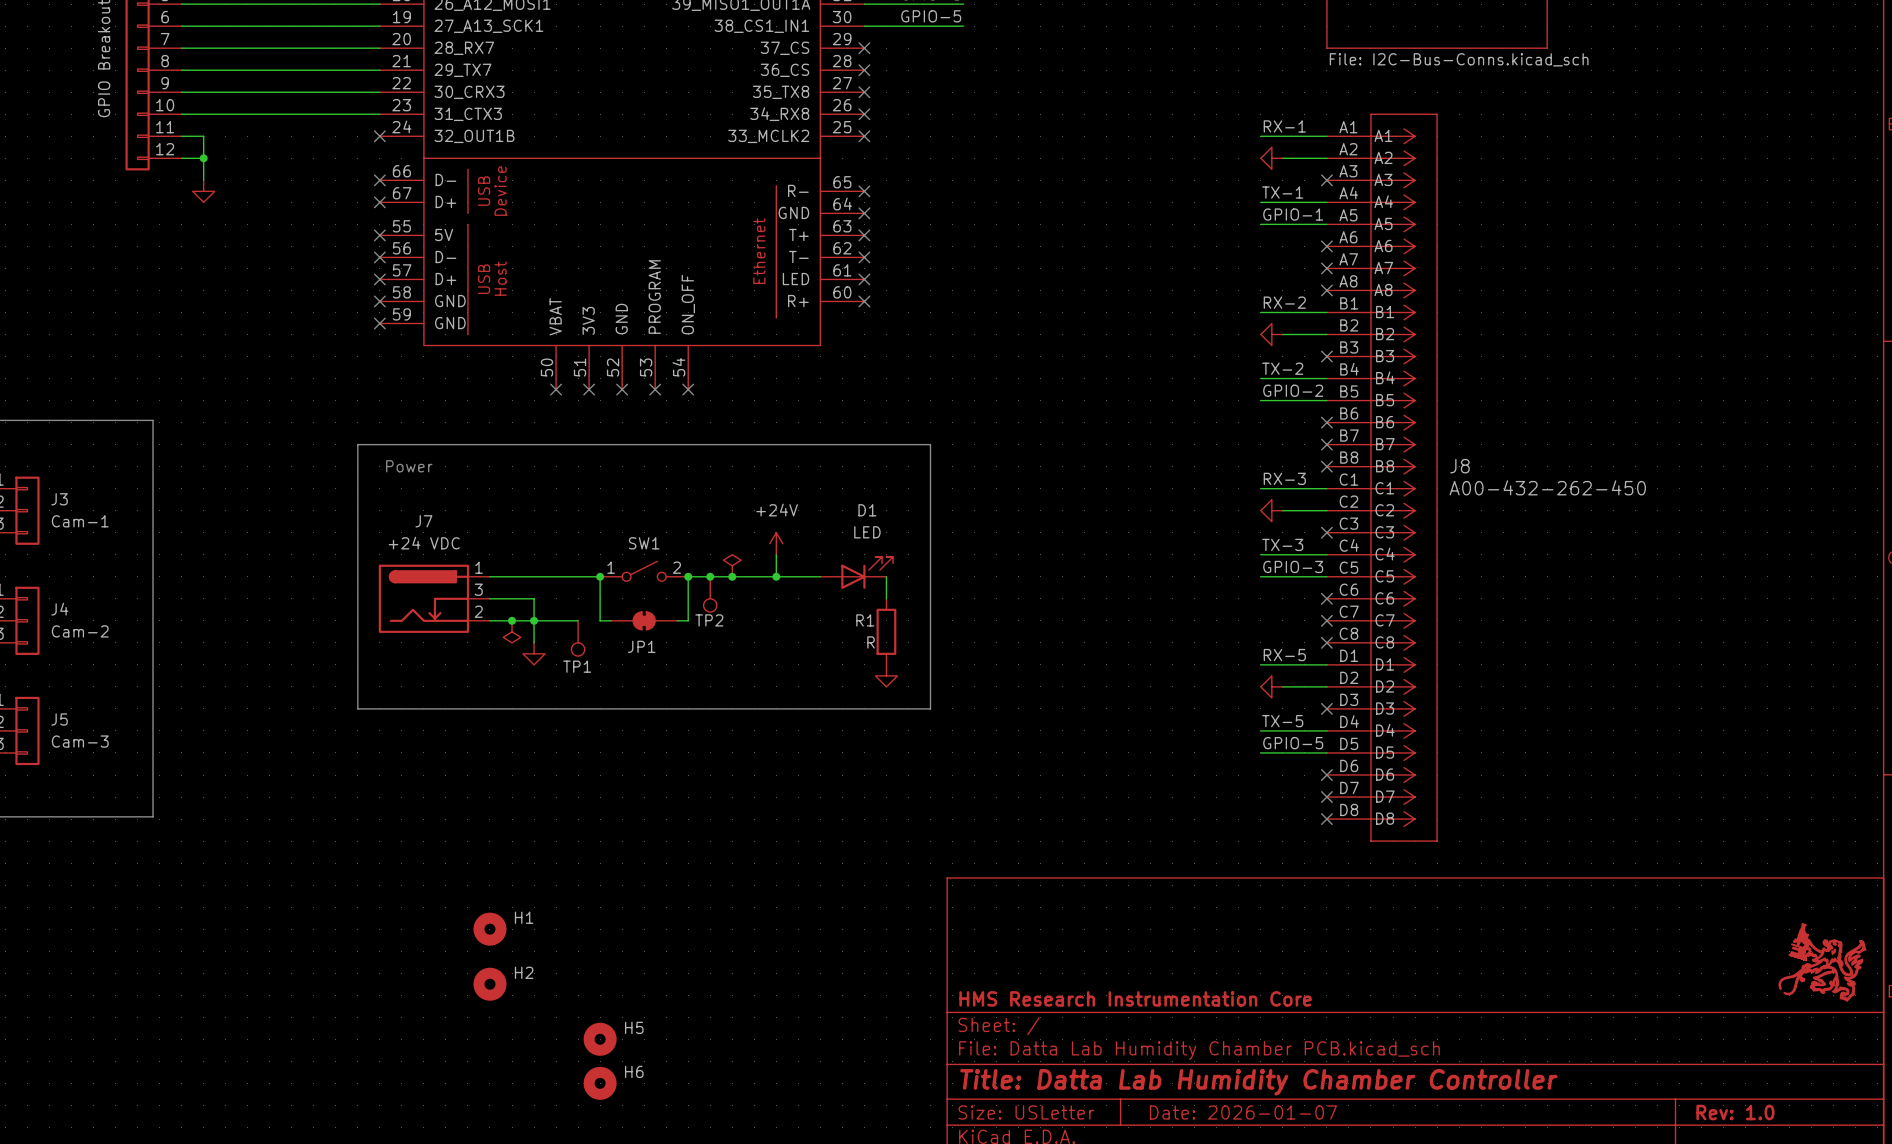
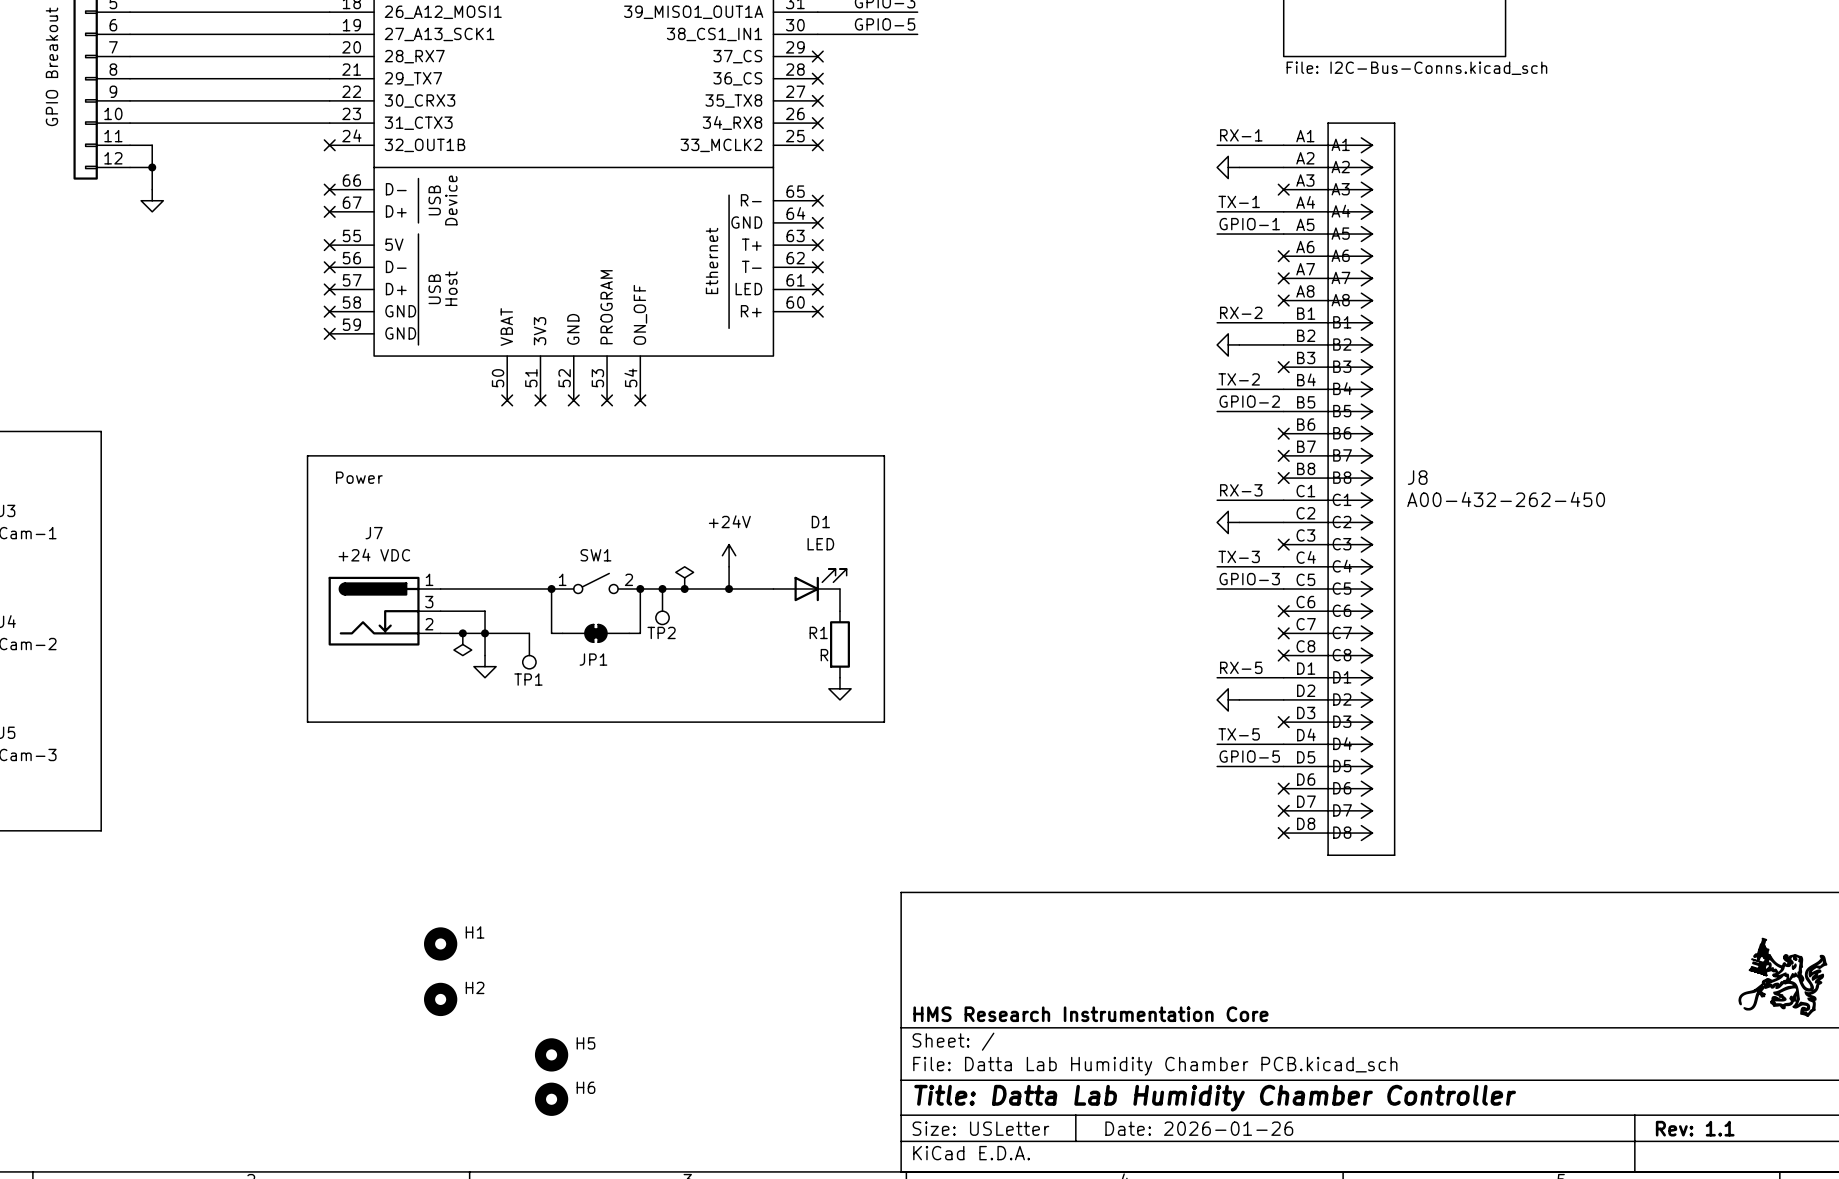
title block: Date: 2026-01-07 (1243, 1112) -> Date: 2026-01-26 (1199, 1128)
title block: Rev: 1.0 (1735, 1112) -> Rev: 1.1 (1695, 1128)

